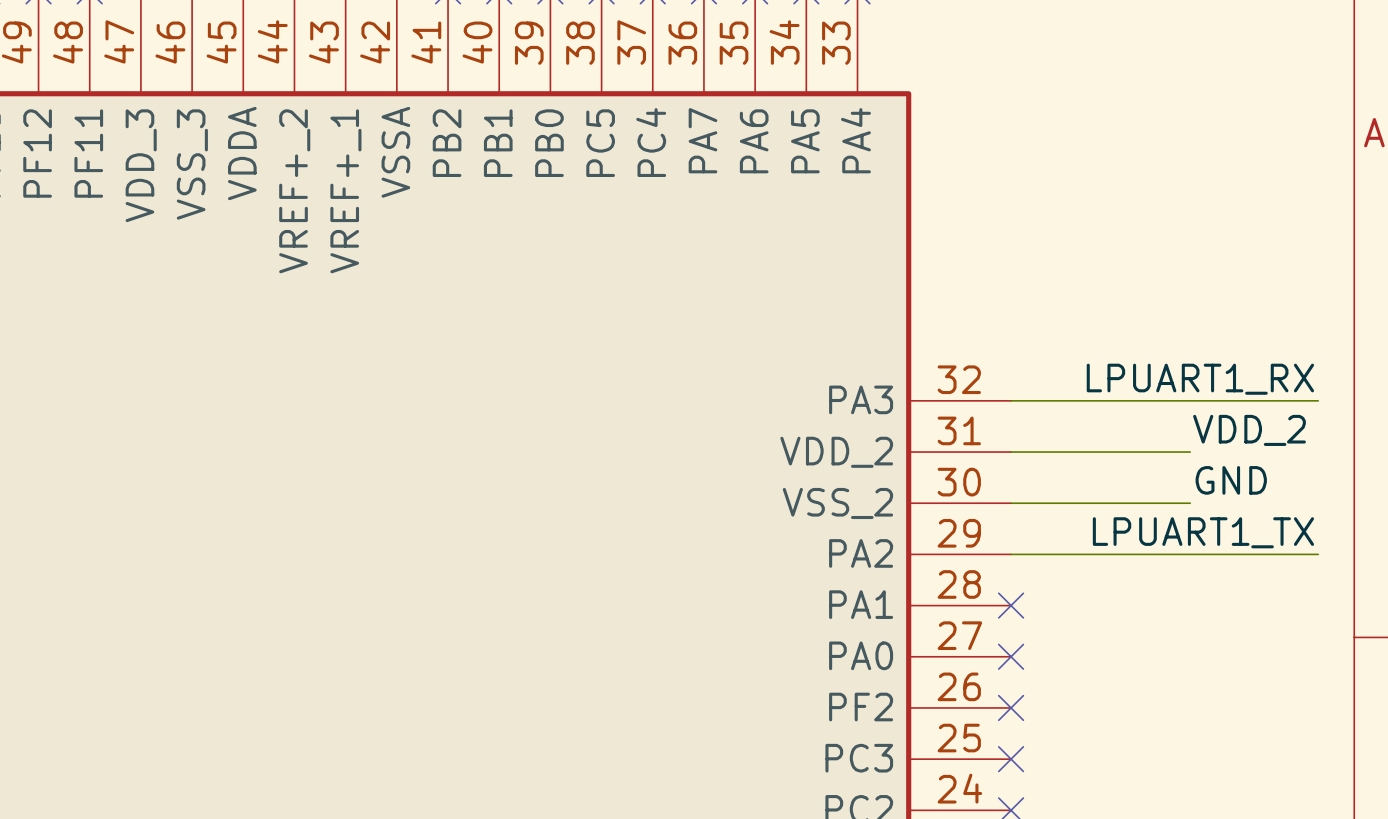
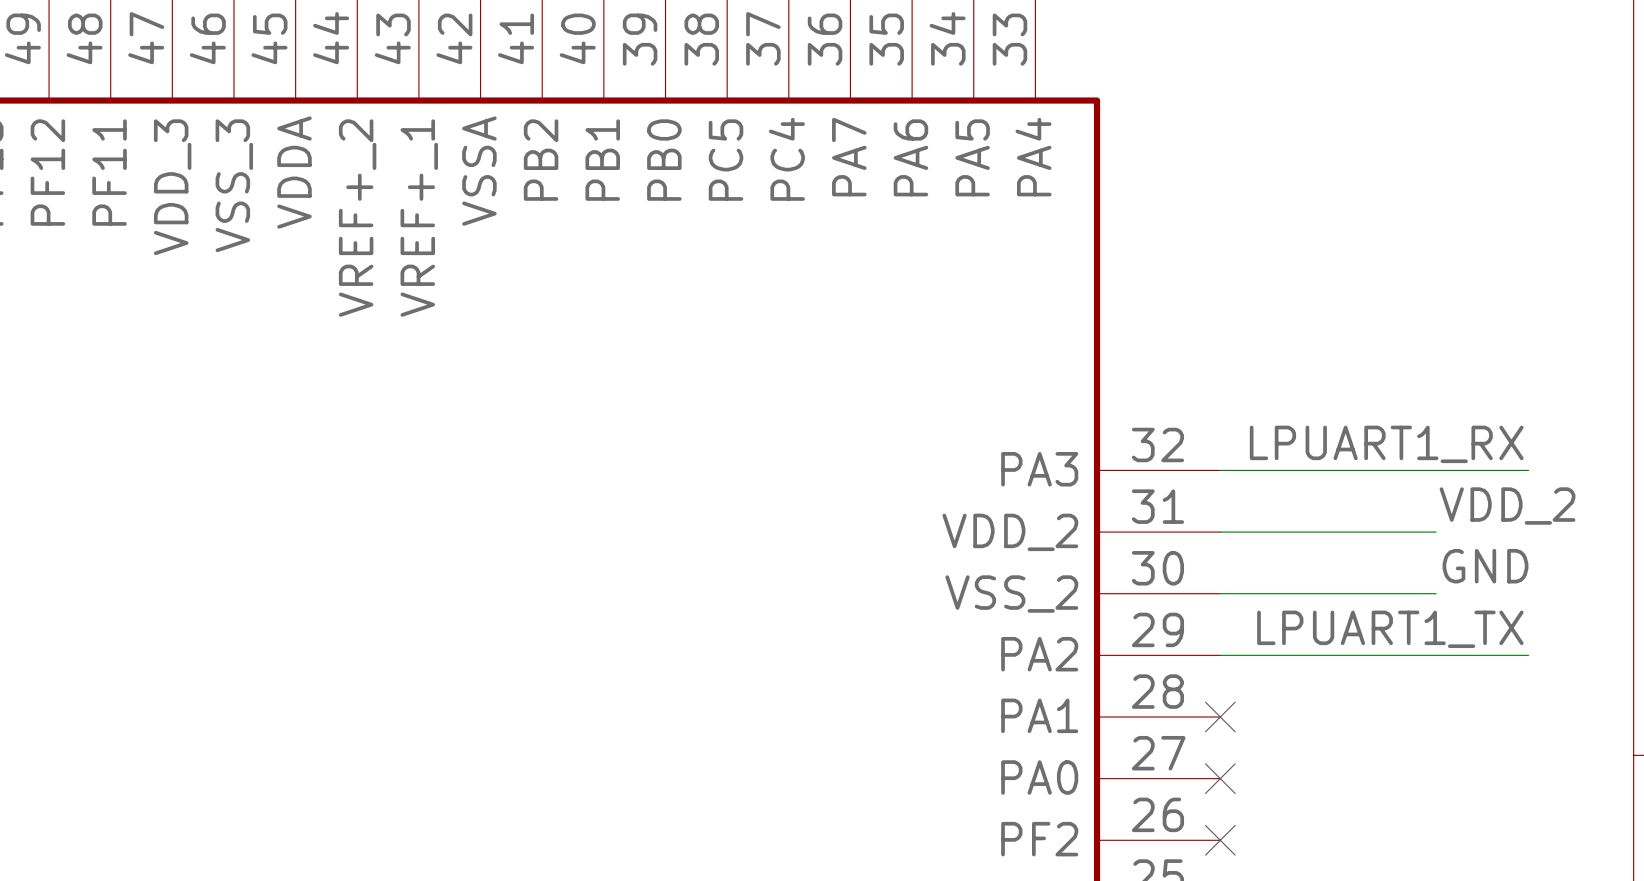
label position: LPUART1_RX (1200, 379) -> LPUART1_RX (1386, 444)
wire: (1266, 400) (1318, 400) -> none
label position: LPUART1_TX (1203, 532) -> LPUART1_TX (1390, 629)
wire: (1266, 554) (1318, 554) -> none

